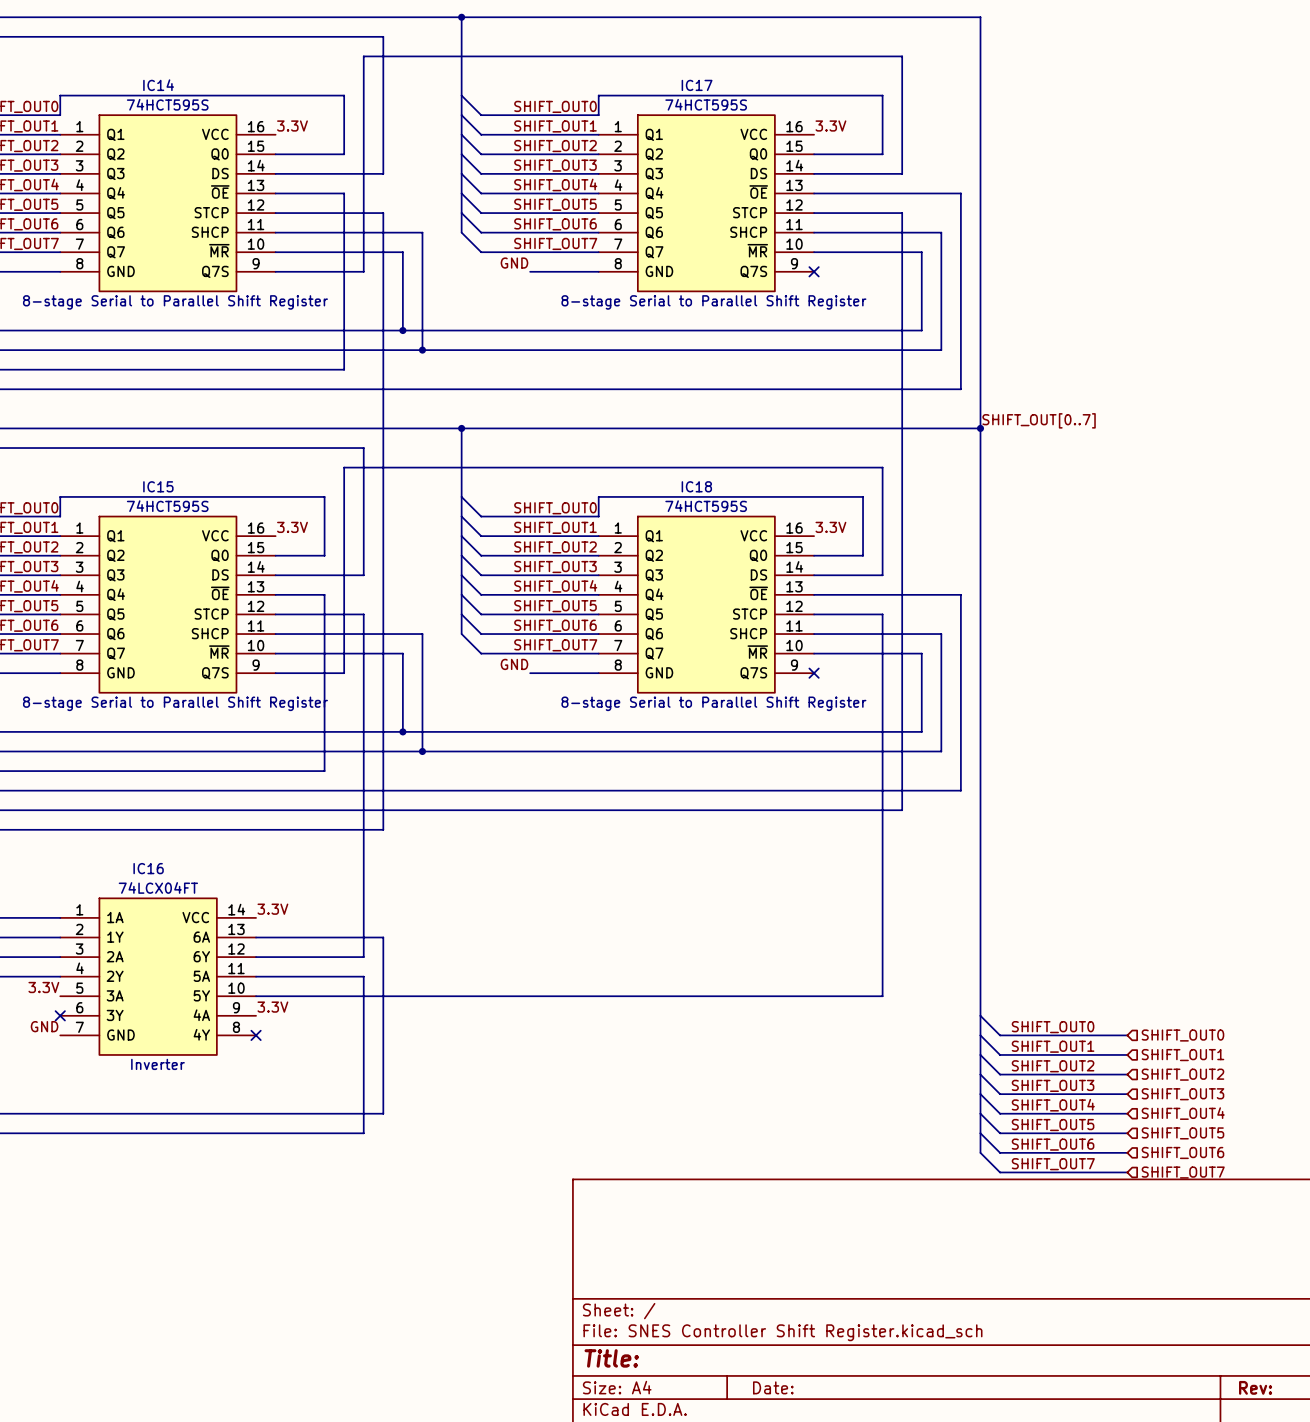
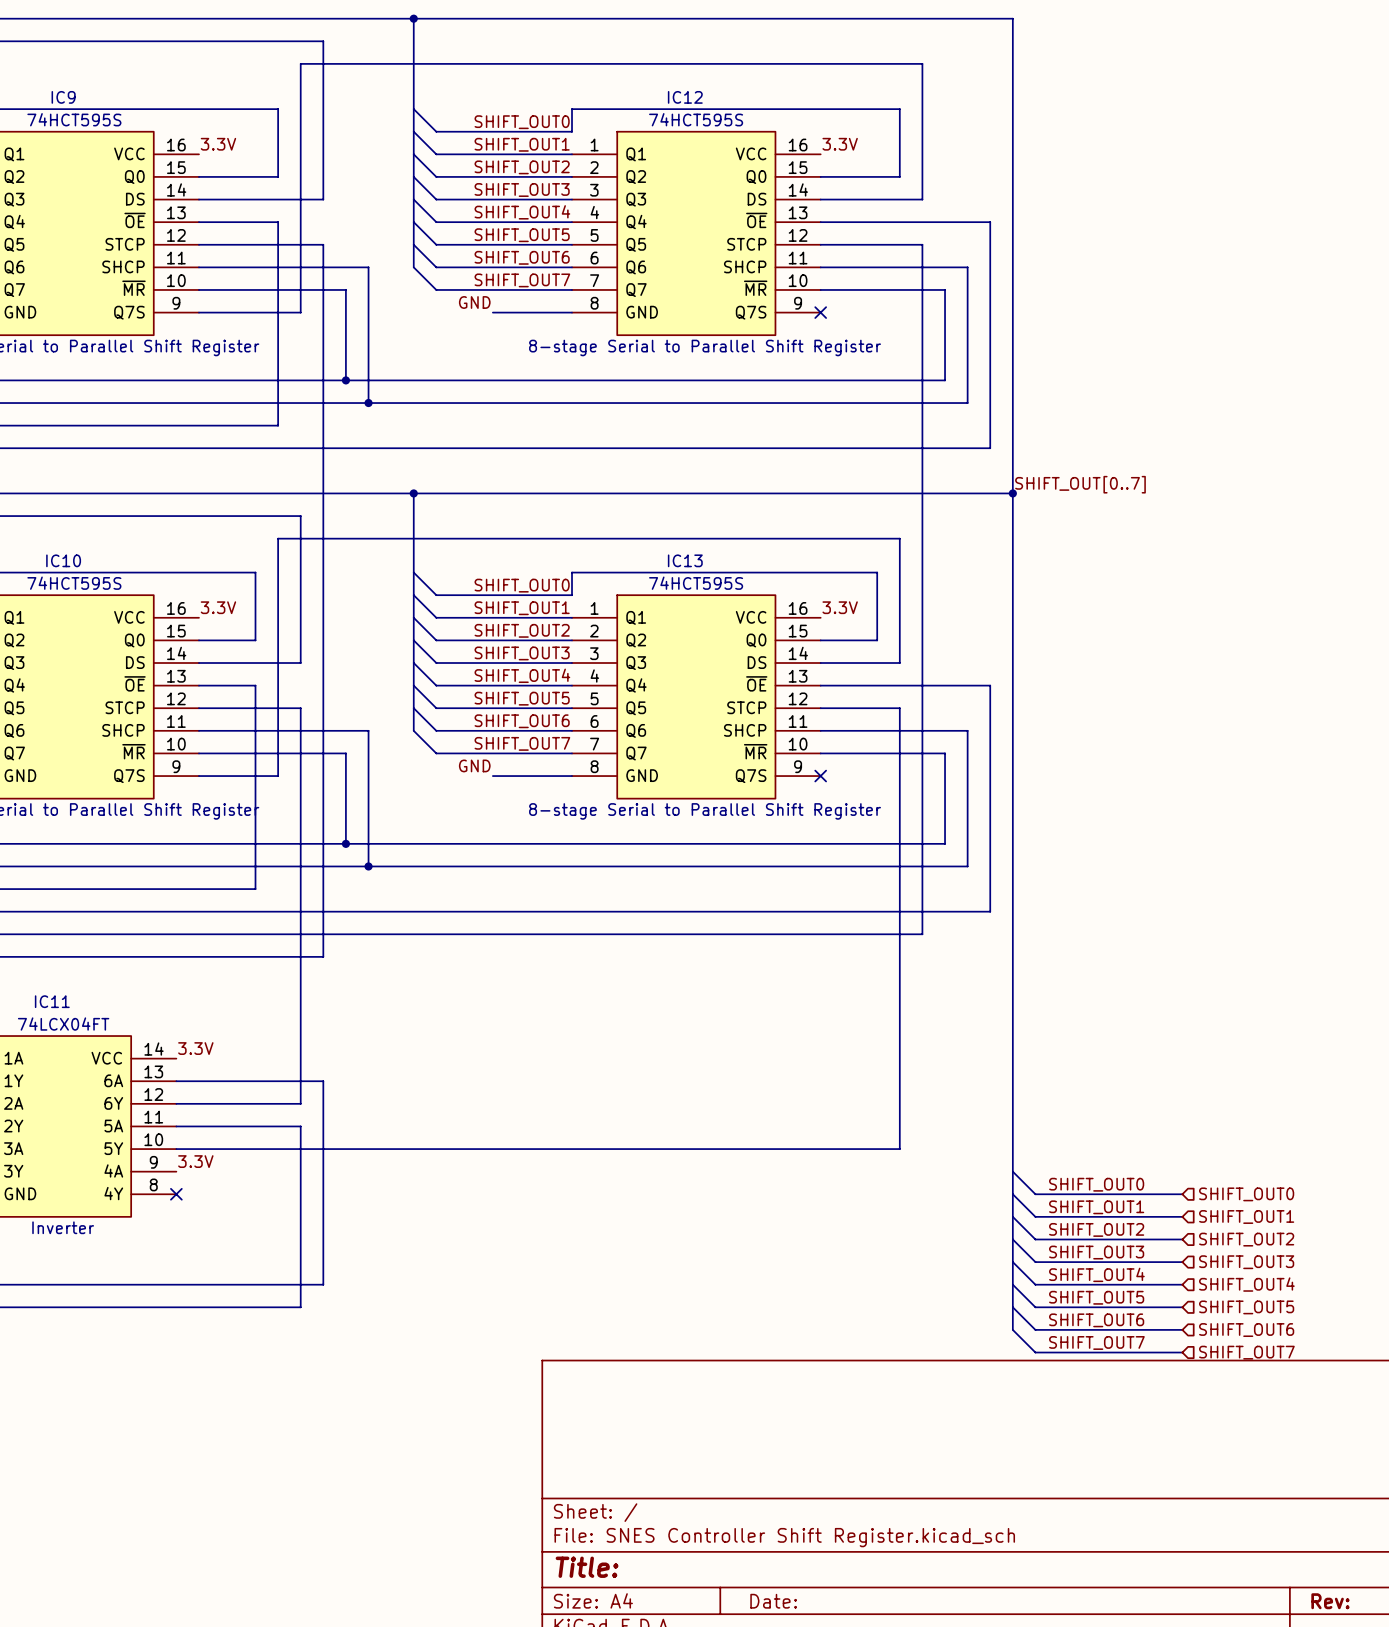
IC14 name: IC14 (158, 85) -> IC9 (63, 97)
IC17 name: IC17 (697, 85) -> IC12 (685, 97)
IC15 name: IC15 (158, 486) -> IC10 (63, 560)
IC18 name: IC18 (696, 486) -> IC13 (685, 560)
IC16 name: IC16 (148, 868) -> IC11 (52, 1001)

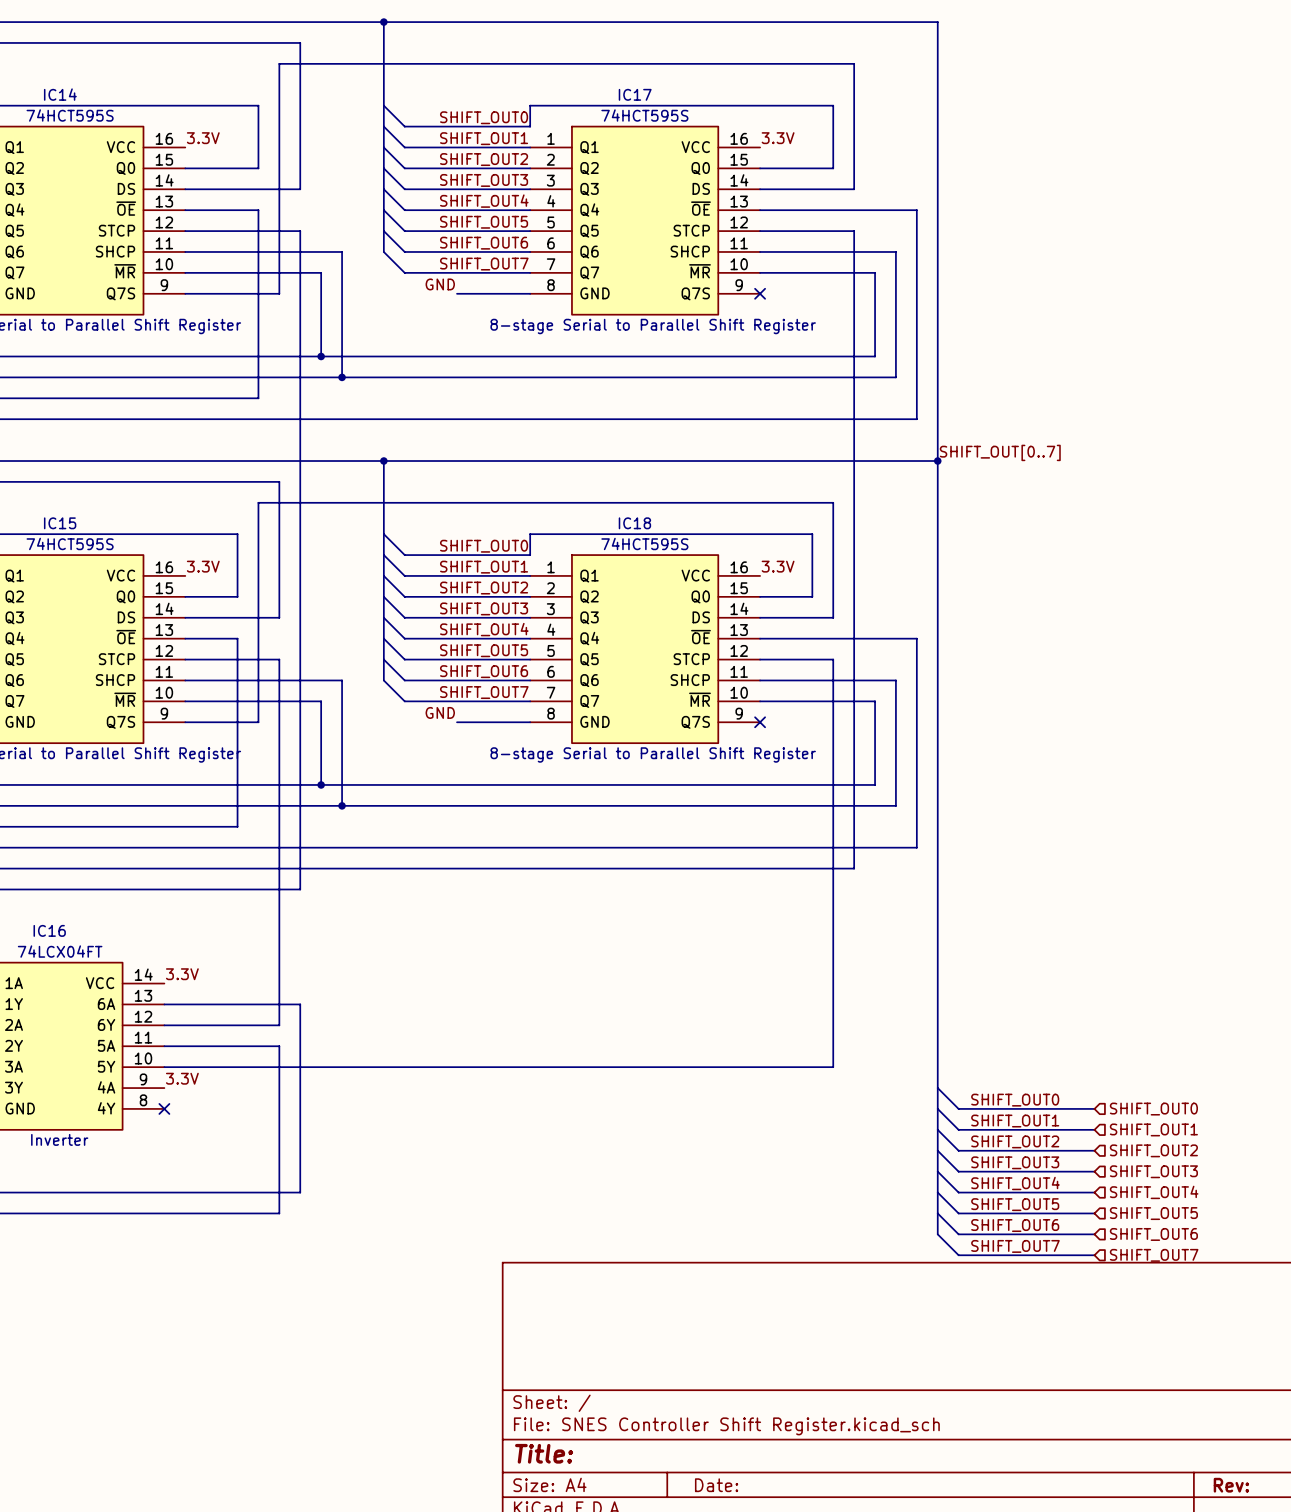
IC9 name: IC9 (63, 97) -> IC14 (60, 94)
IC12 name: IC12 (685, 97) -> IC17 (635, 94)
IC10 name: IC10 (63, 560) -> IC15 (60, 523)
IC13 name: IC13 (685, 560) -> IC18 (634, 523)
IC11 name: IC11 (52, 1001) -> IC16 (49, 930)

